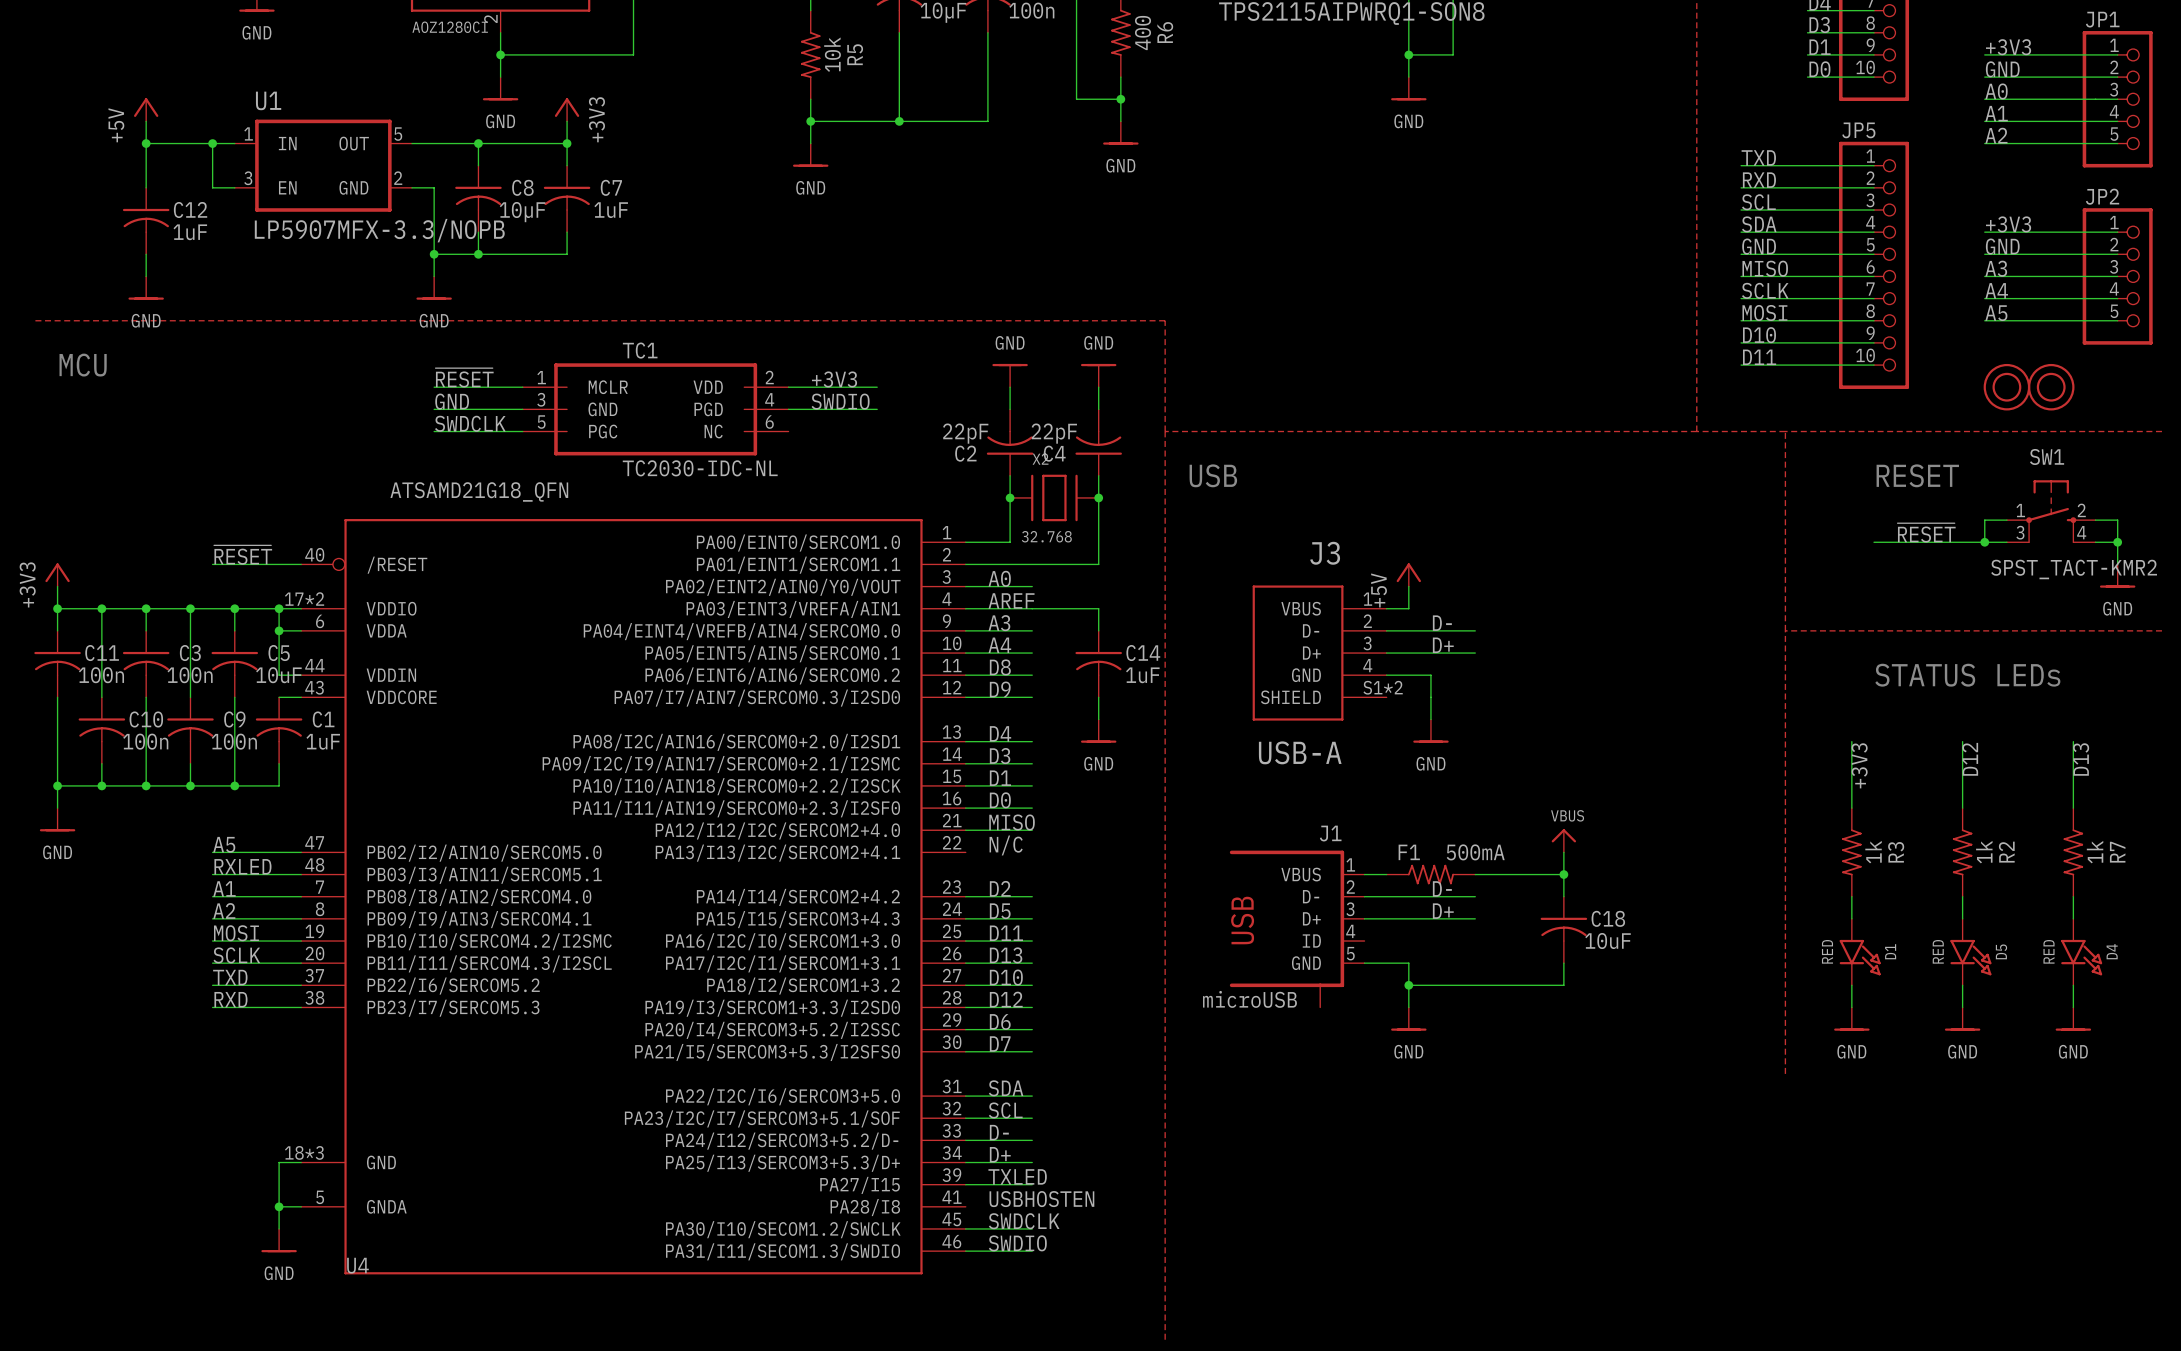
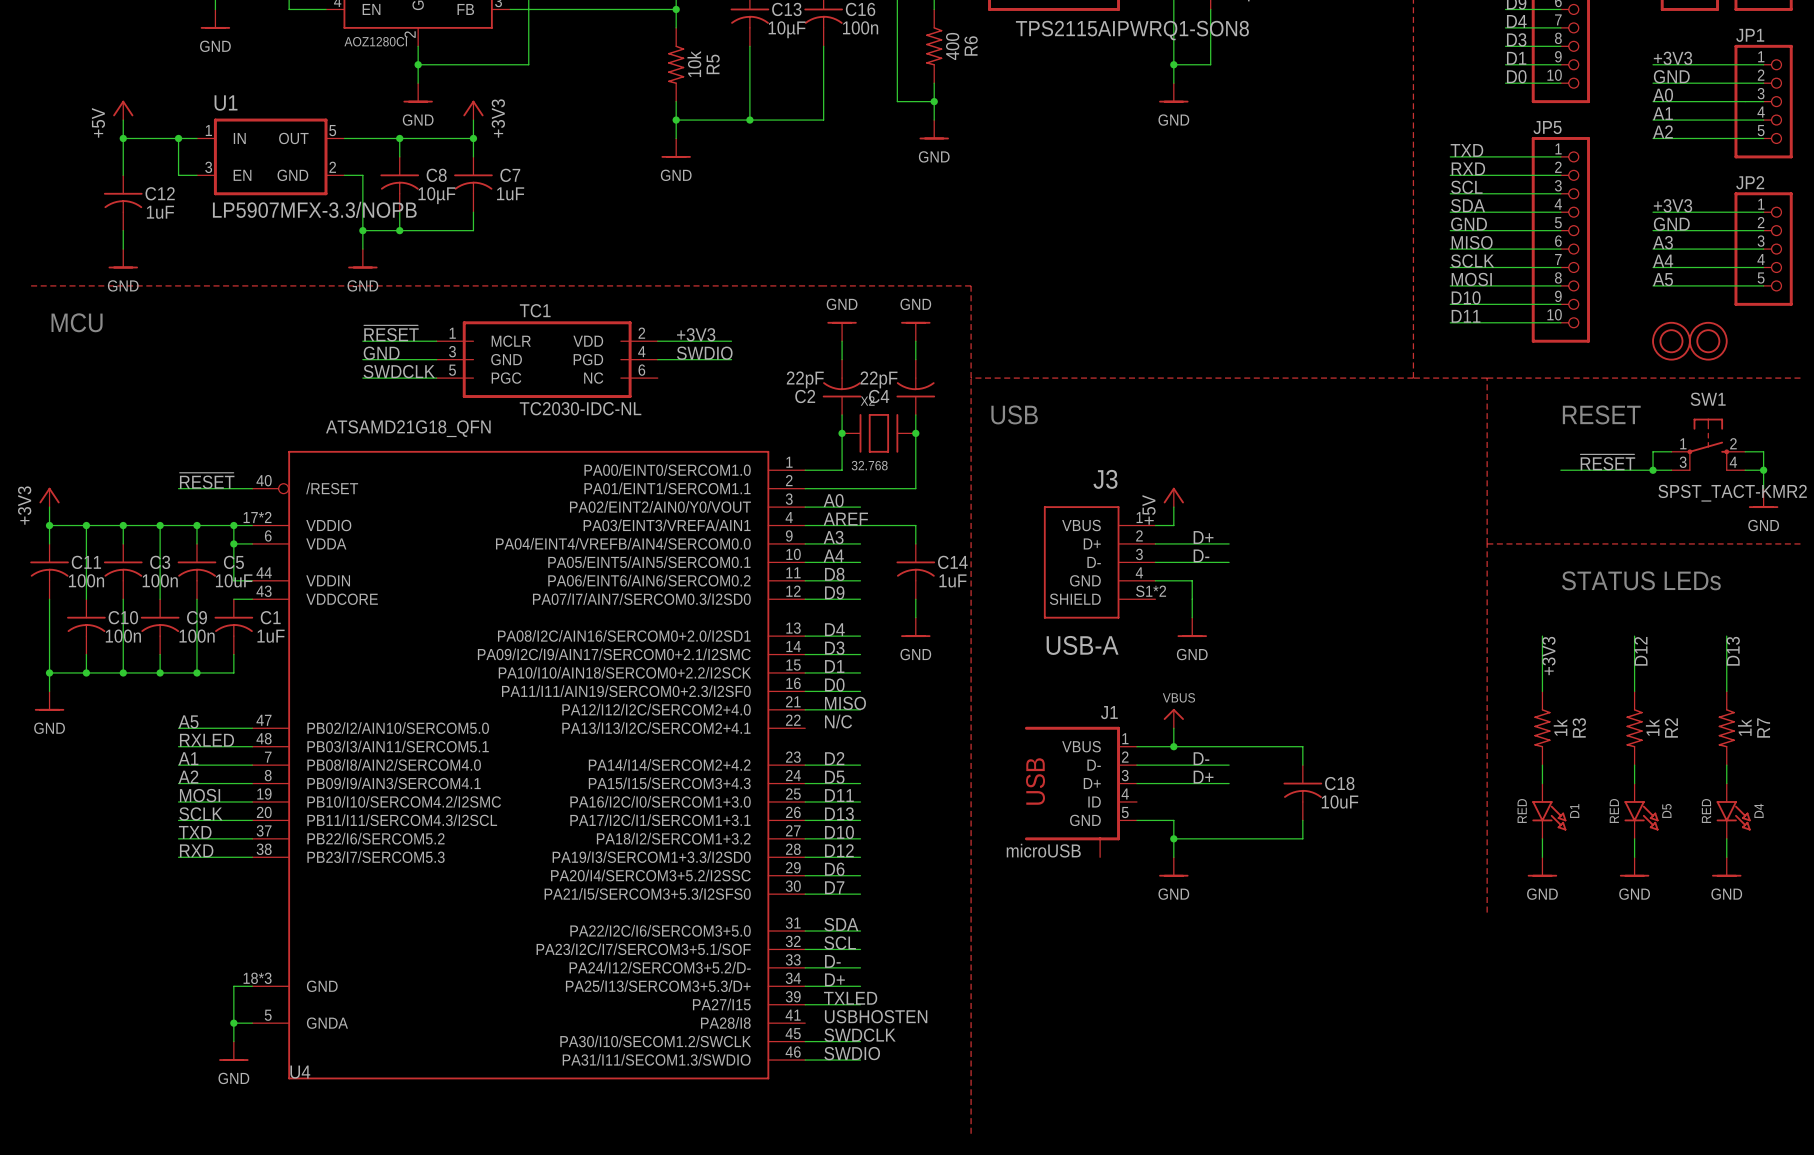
label: D- (1442, 623) -> D+ (1203, 537)
J3 pin name: D- (1311, 630) -> D+ (1092, 543)
label: D+ (1443, 645) -> D- (1201, 555)
J3 pin name: D+ (1311, 653) -> D- (1094, 562)
power symbol position: VBUS (1563, 840) -> VBUS (1173, 718)
wire: (1563, 852) (1563, 874) -> (1173, 728) (1173, 746)
junction: none -> (1173, 746)
F1: 500mA (1430, 874) -> none
junction: (1563, 874) -> none

